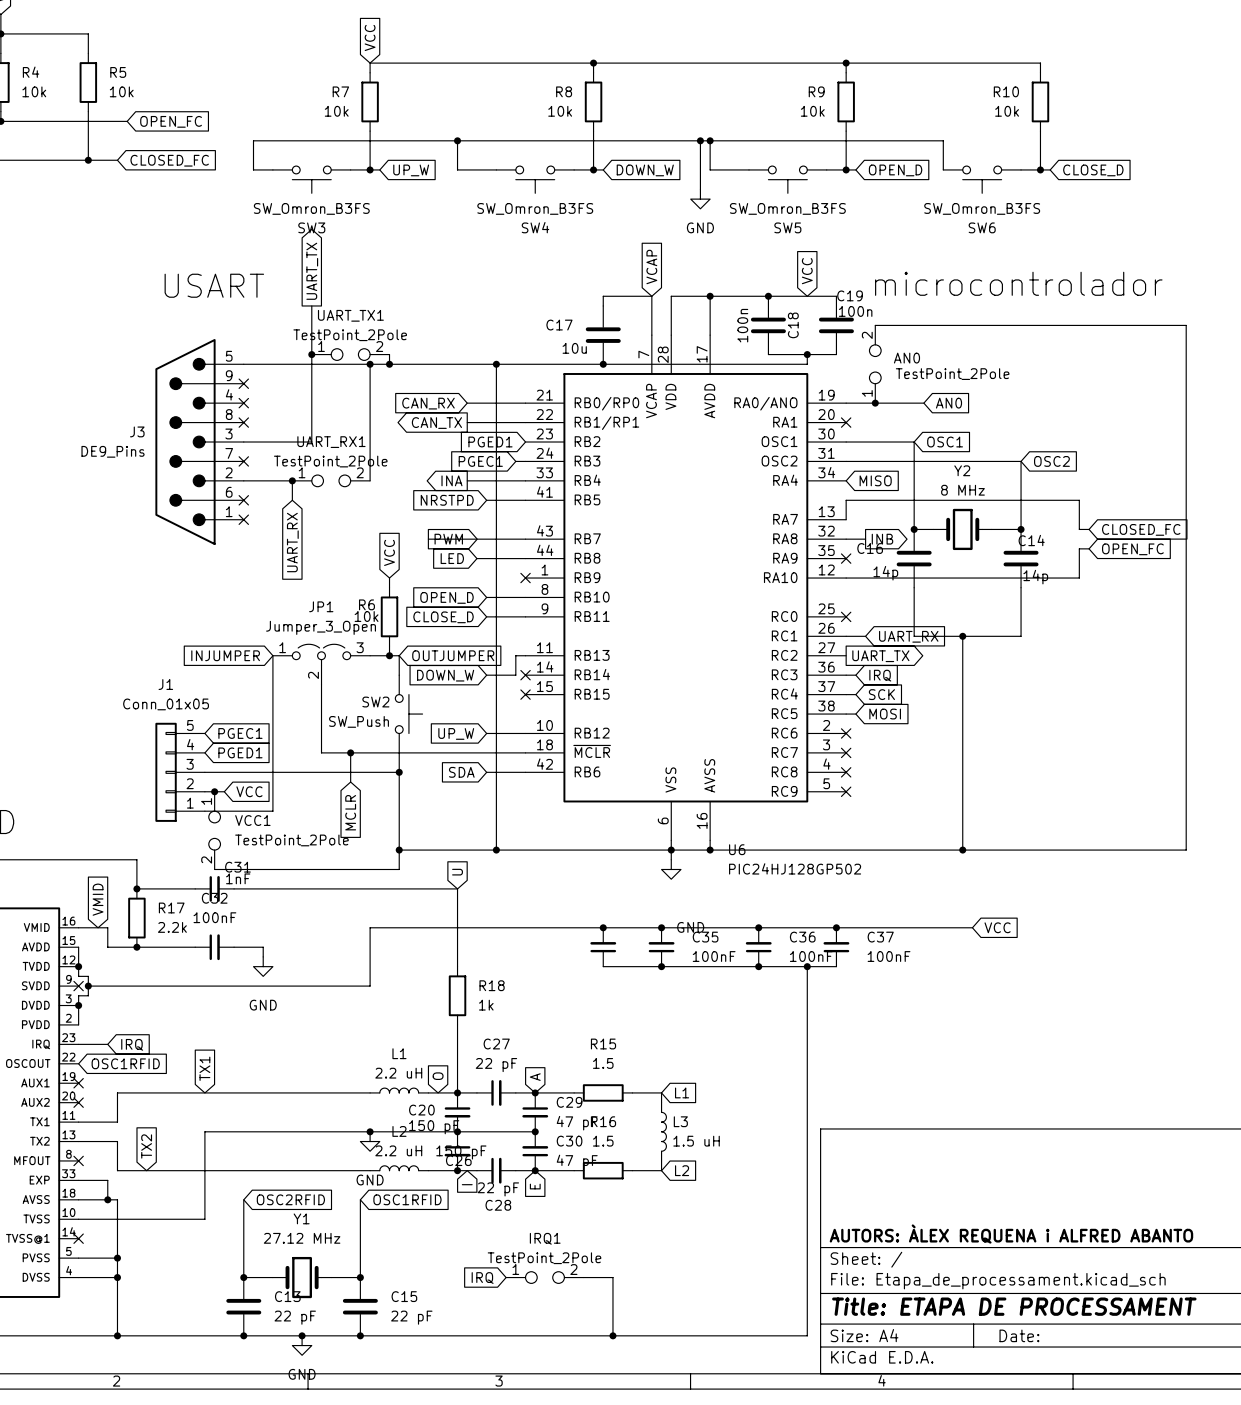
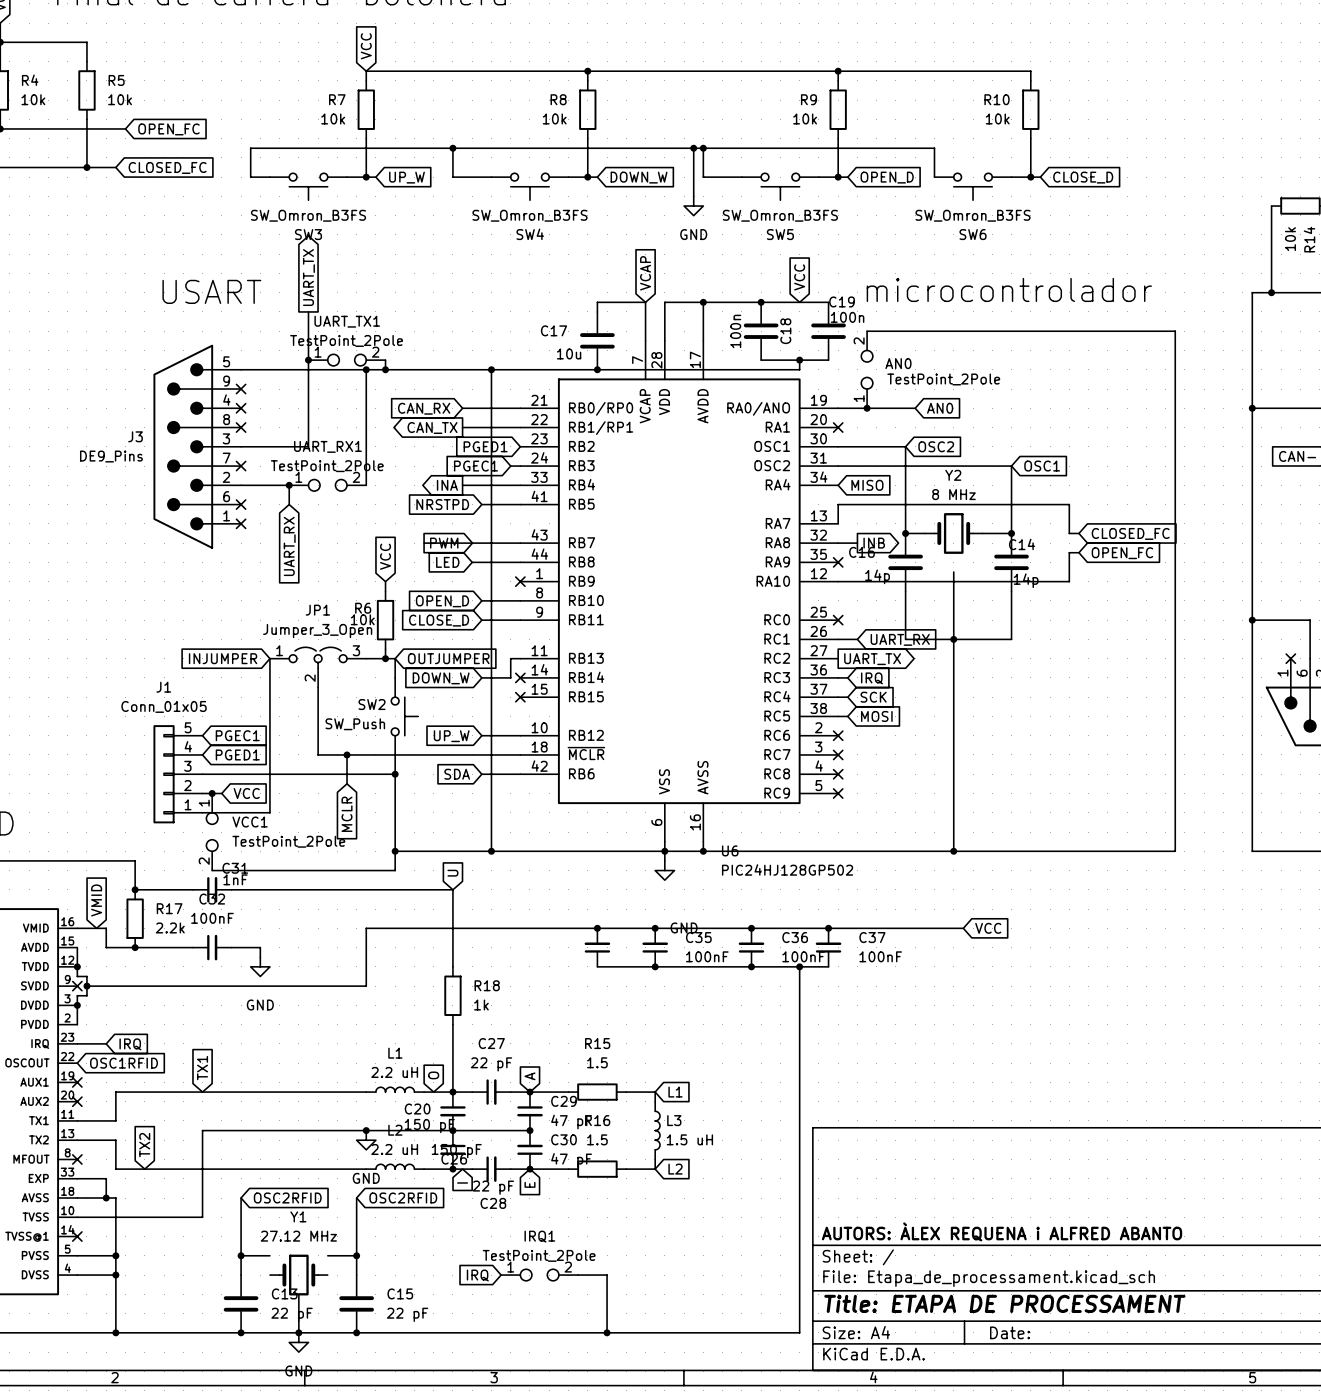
global label: OSC1 (945, 442) -> OSC2 (936, 446)
global label: OSC2 (1051, 461) -> OSC1 (1042, 466)
wire: none -> (953, 571) (953, 639)
global label: OSC1RFID (407, 1199) -> OSC2RFID (403, 1198)
wire: (243, 1277) (272, 1277) -> (241, 1255) (269, 1255)
junction position: (243, 1277) -> (241, 1255)
wire: (331, 1277) (360, 1277) -> (327, 1255) (356, 1255)
junction position: (360, 1277) -> (356, 1255)
wire: none -> (298, 1294) (298, 1332)

